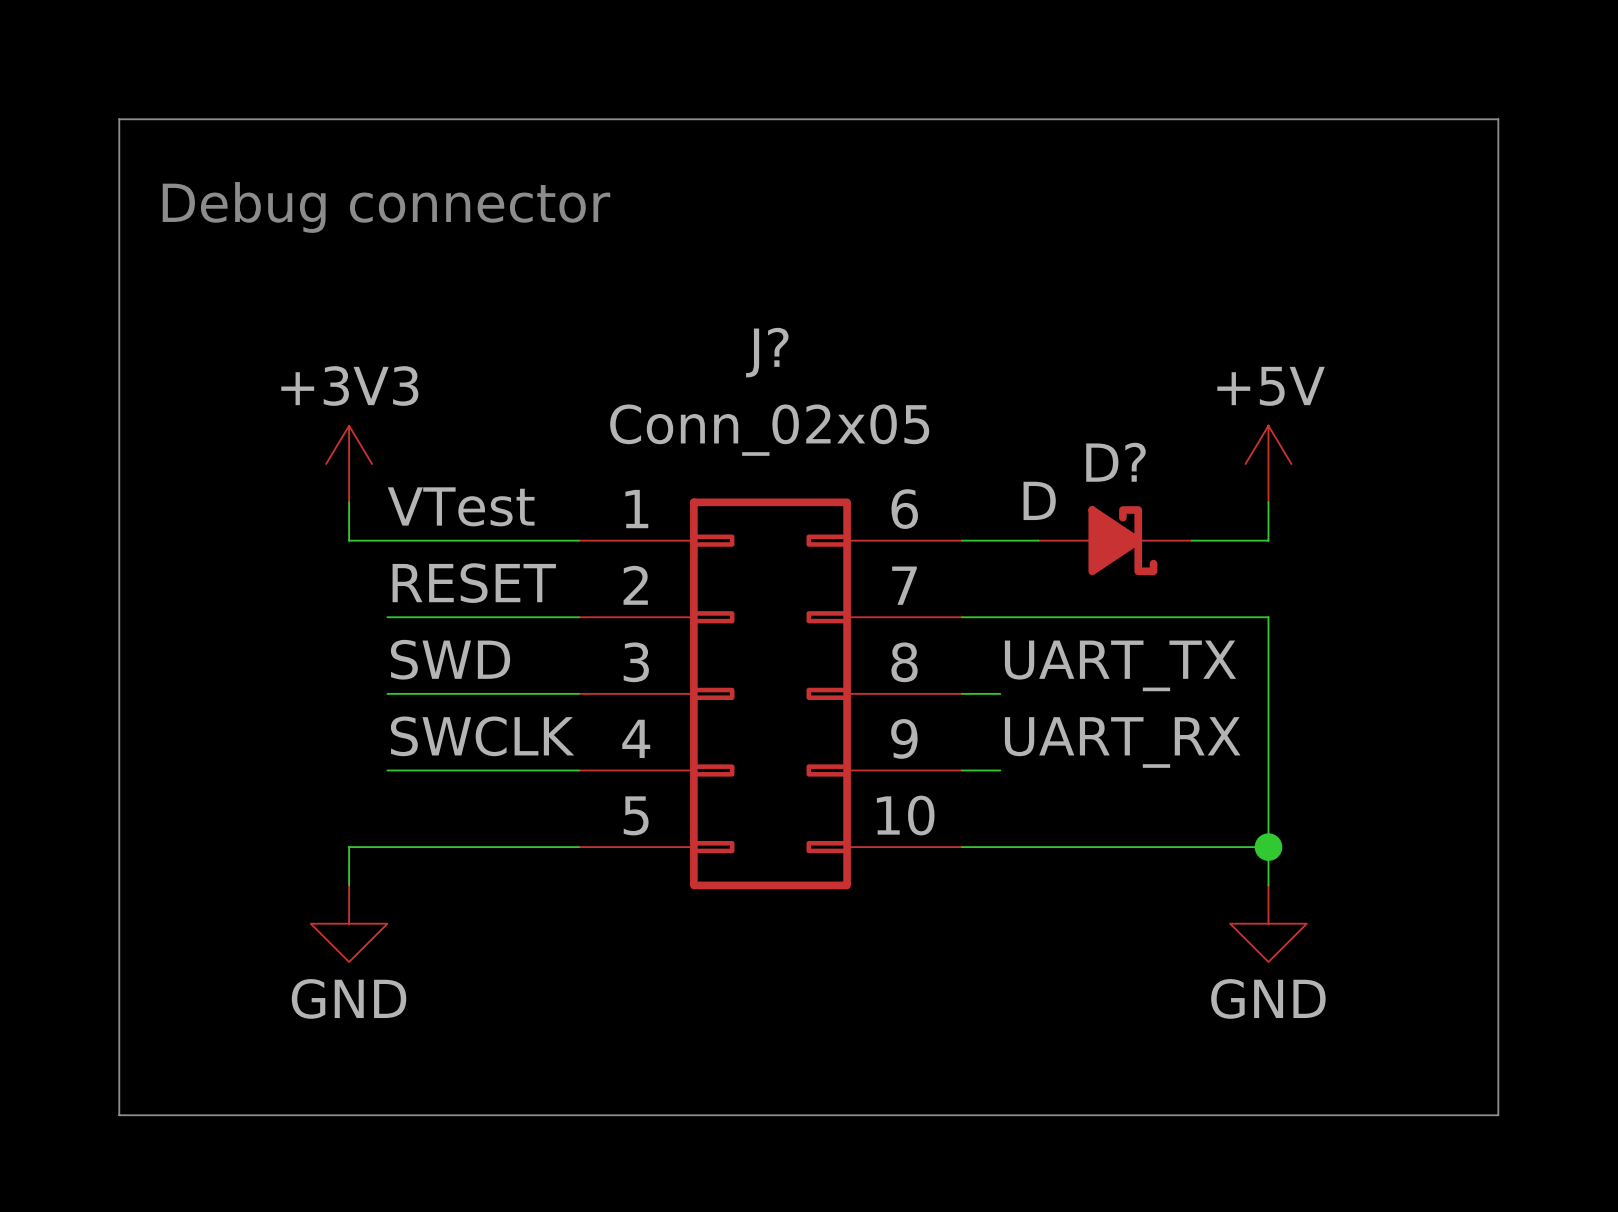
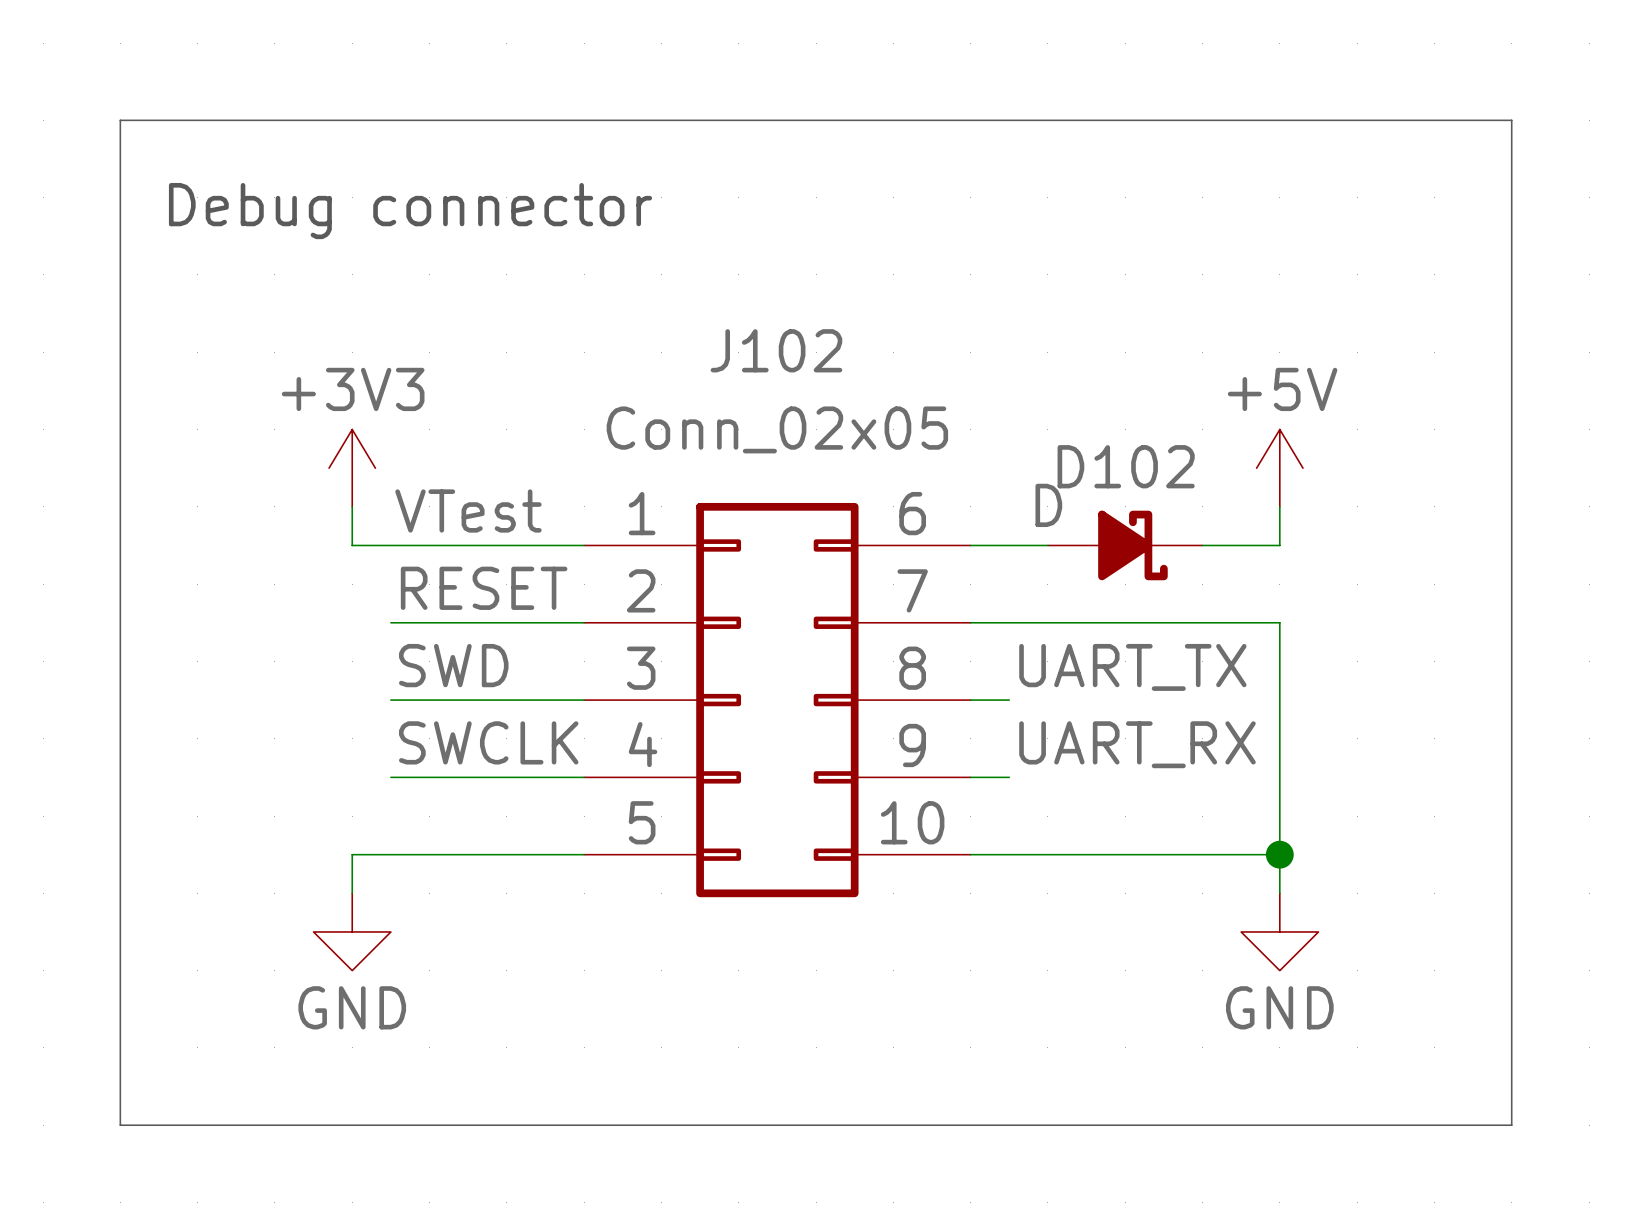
J? name: J? (767, 352) -> J102 (776, 350)
D? name: D? (1115, 462) -> D102 (1126, 466)

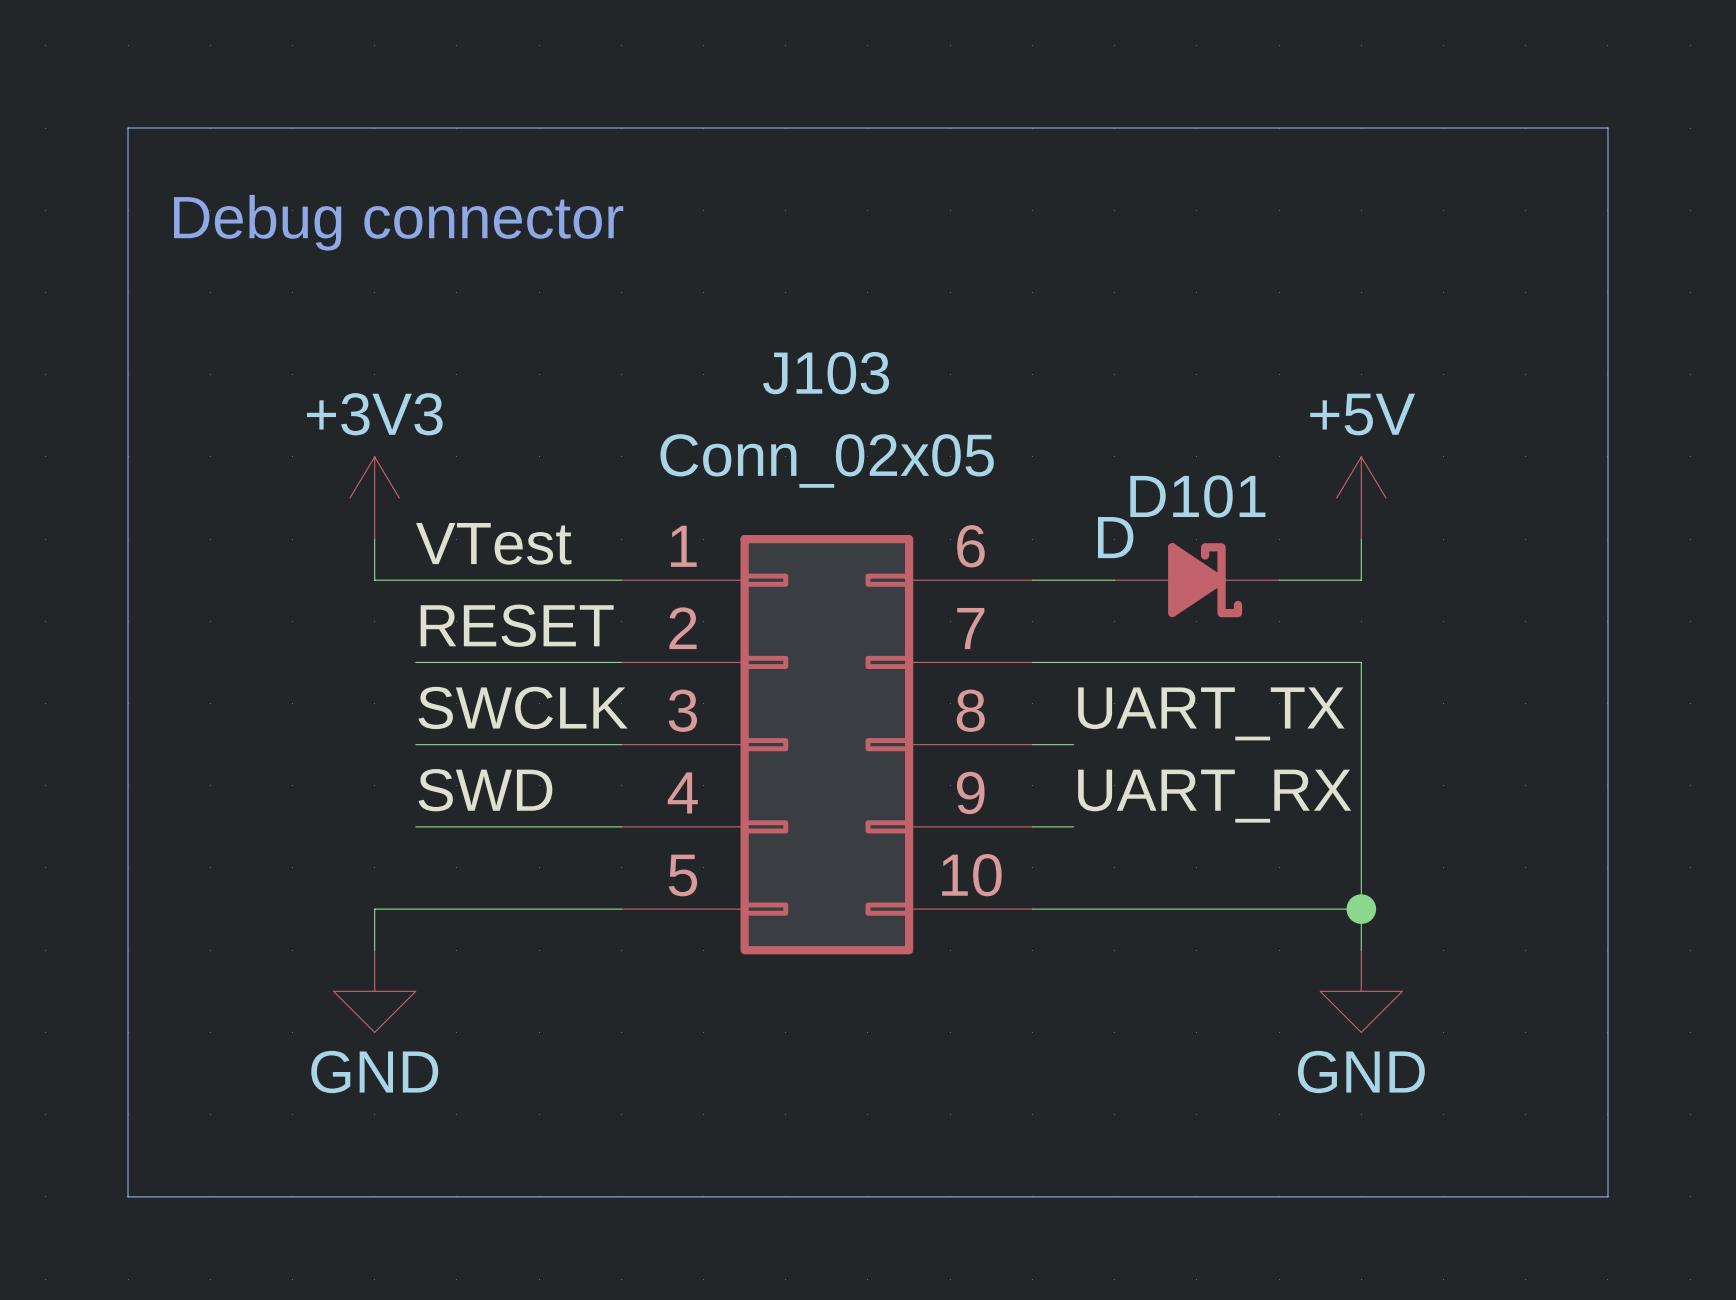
J102 name: J102 (776, 350) -> J103 (826, 373)
D102 name: D102 (1126, 466) -> D101 (1197, 496)
label: SWD (453, 665) -> SWCLK (523, 707)
label: SWCLK (488, 742) -> SWD (485, 790)

